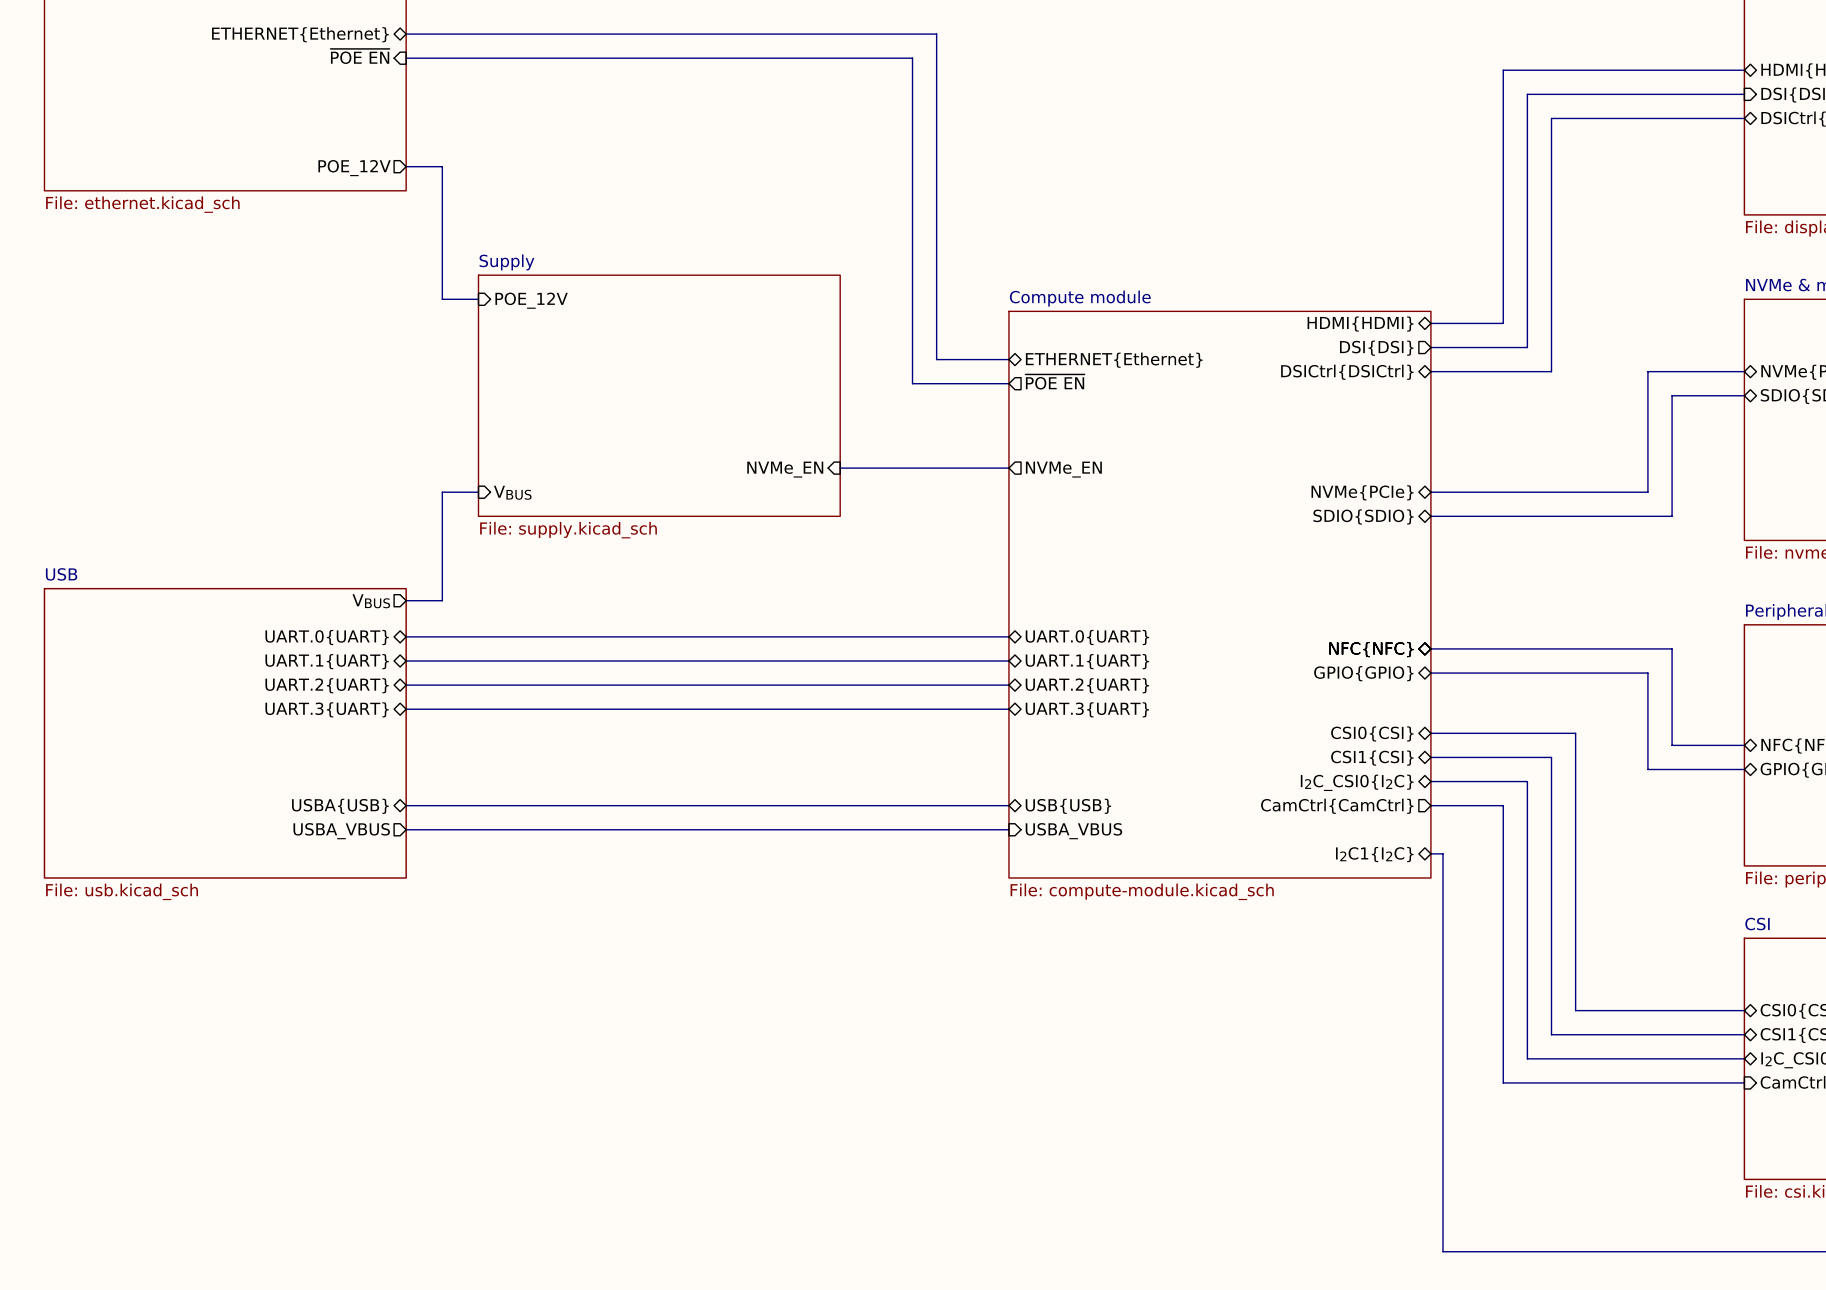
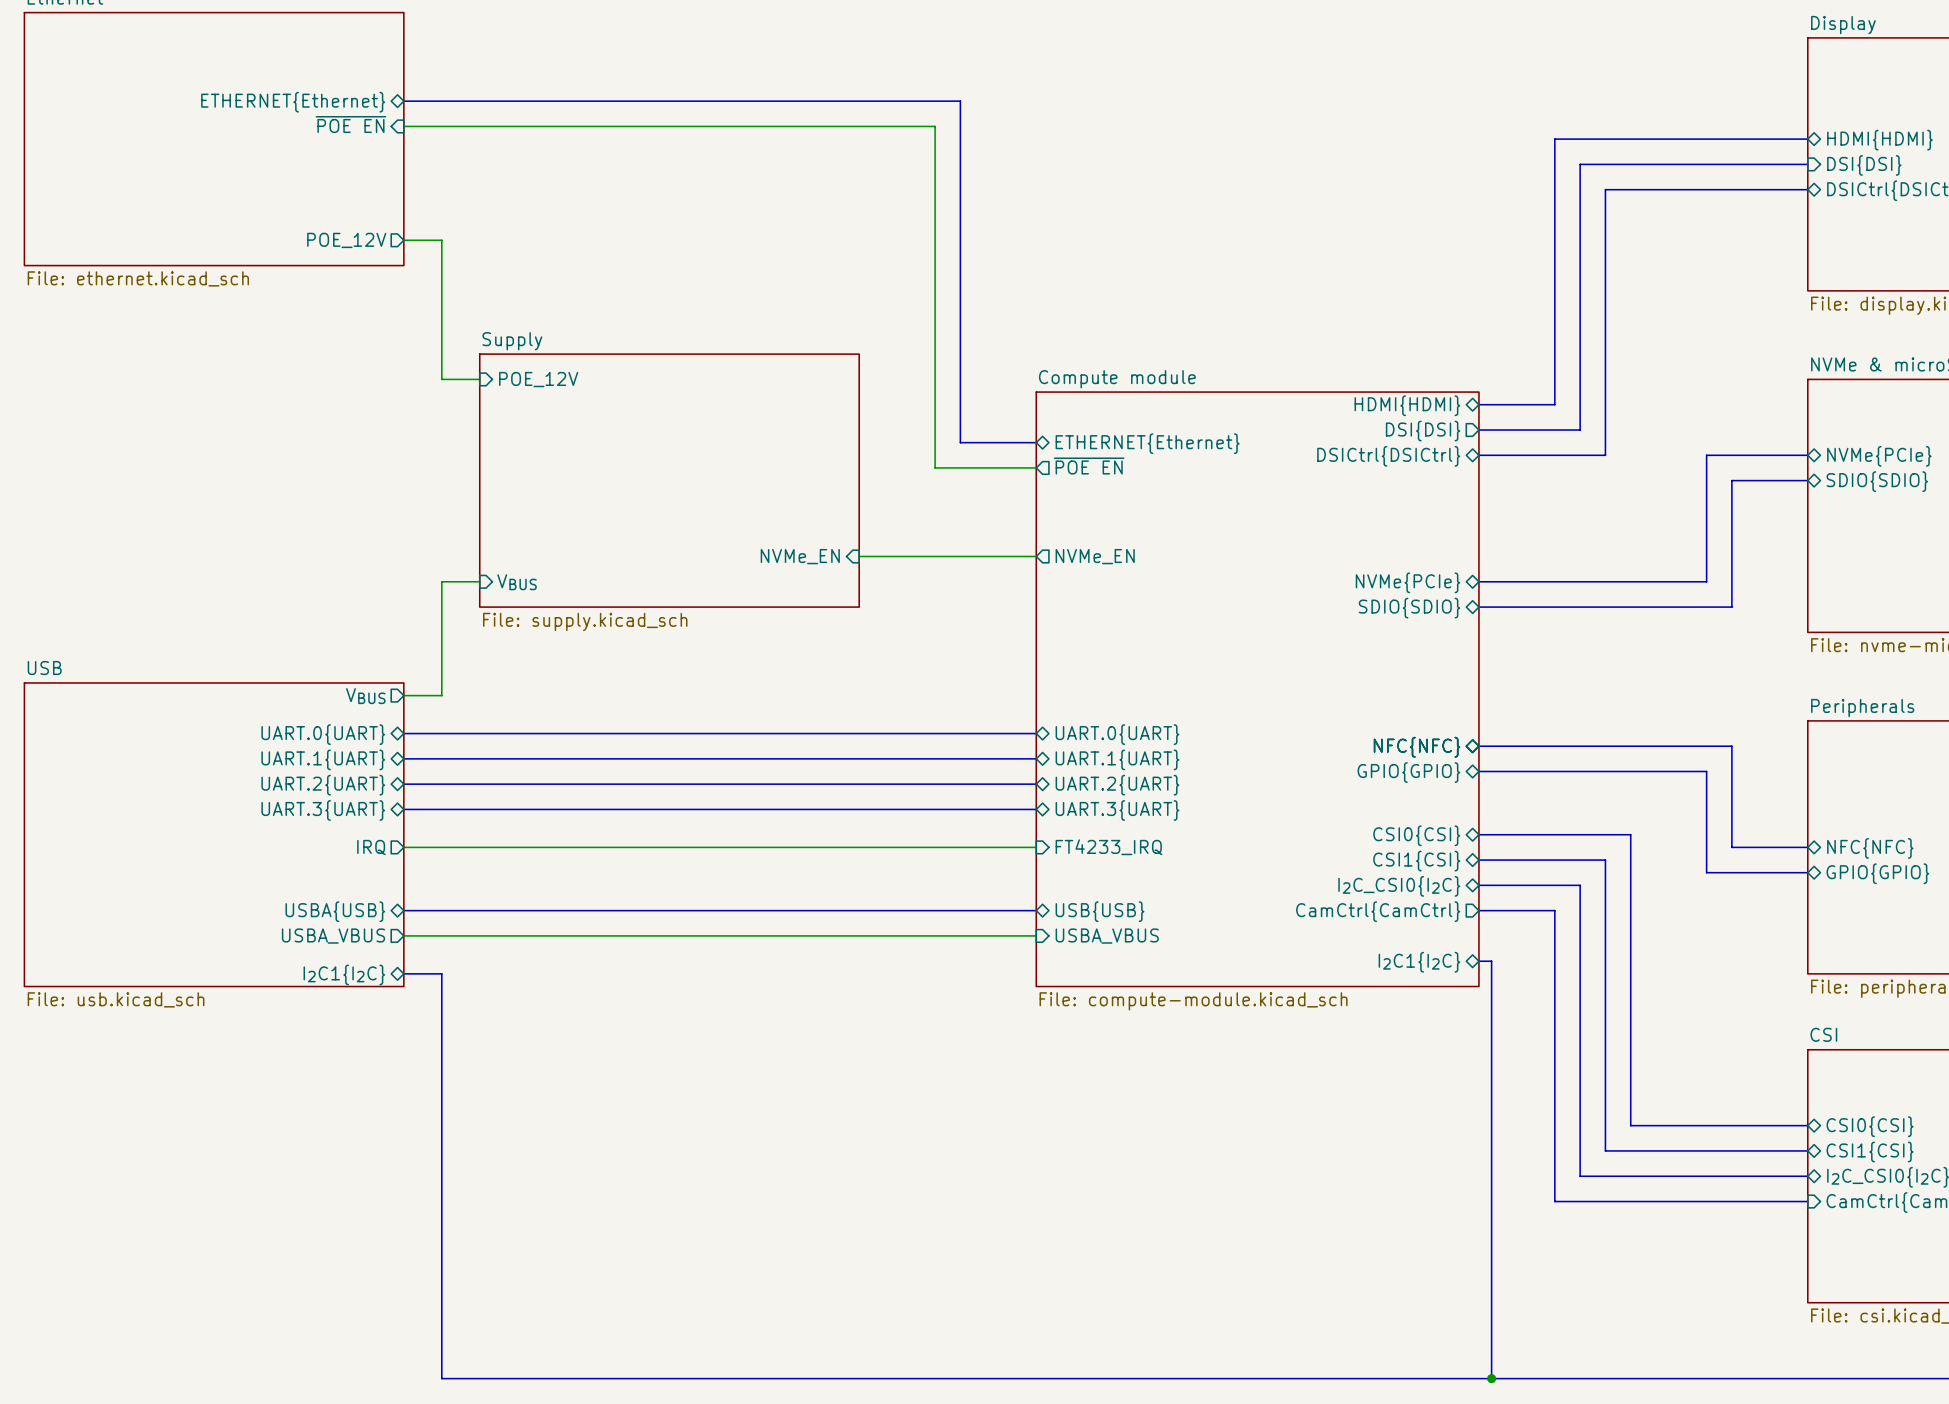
sheet pin: none -> IRQ (371, 847)
wire: none -> (403, 847) (1036, 847)
sheet pin: none -> FT4233_IRQ (1109, 847)
bus: none -> (403, 973) (441, 973) (441, 1378) (1491, 1378)
sheet pin: none -> I2C1{I2C} (344, 974)
junction: none -> (1491, 1378)

